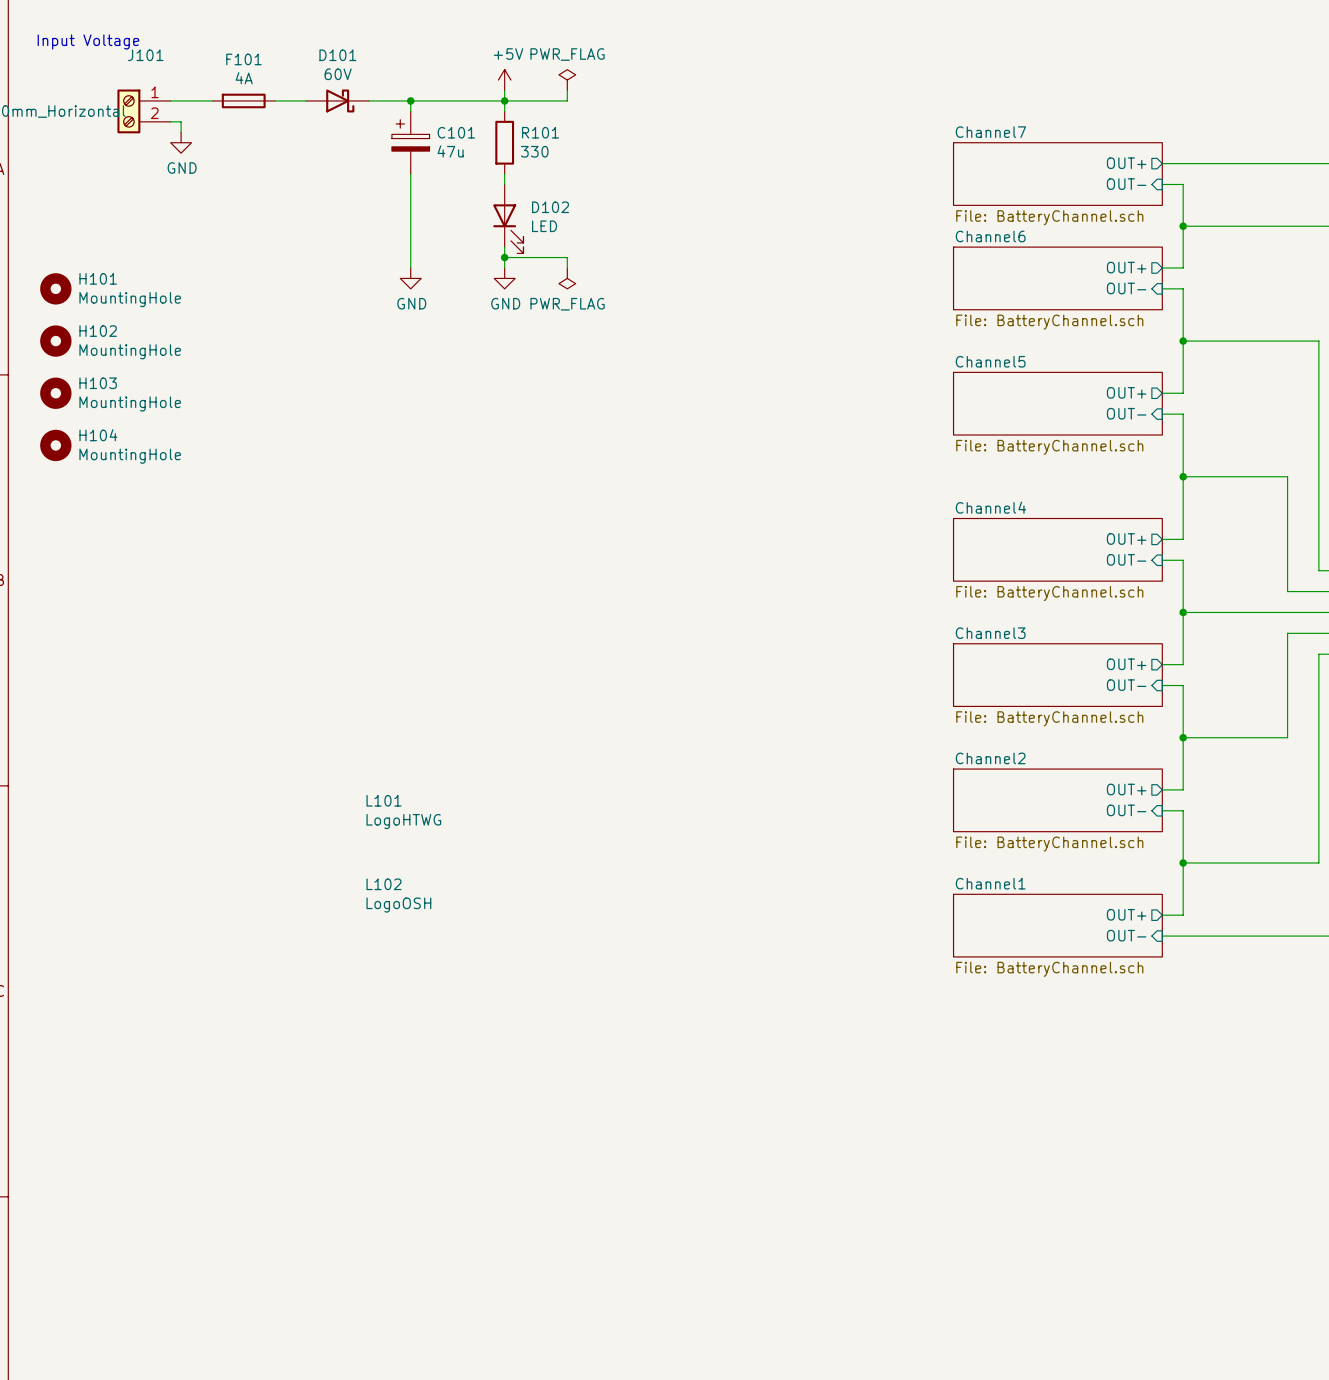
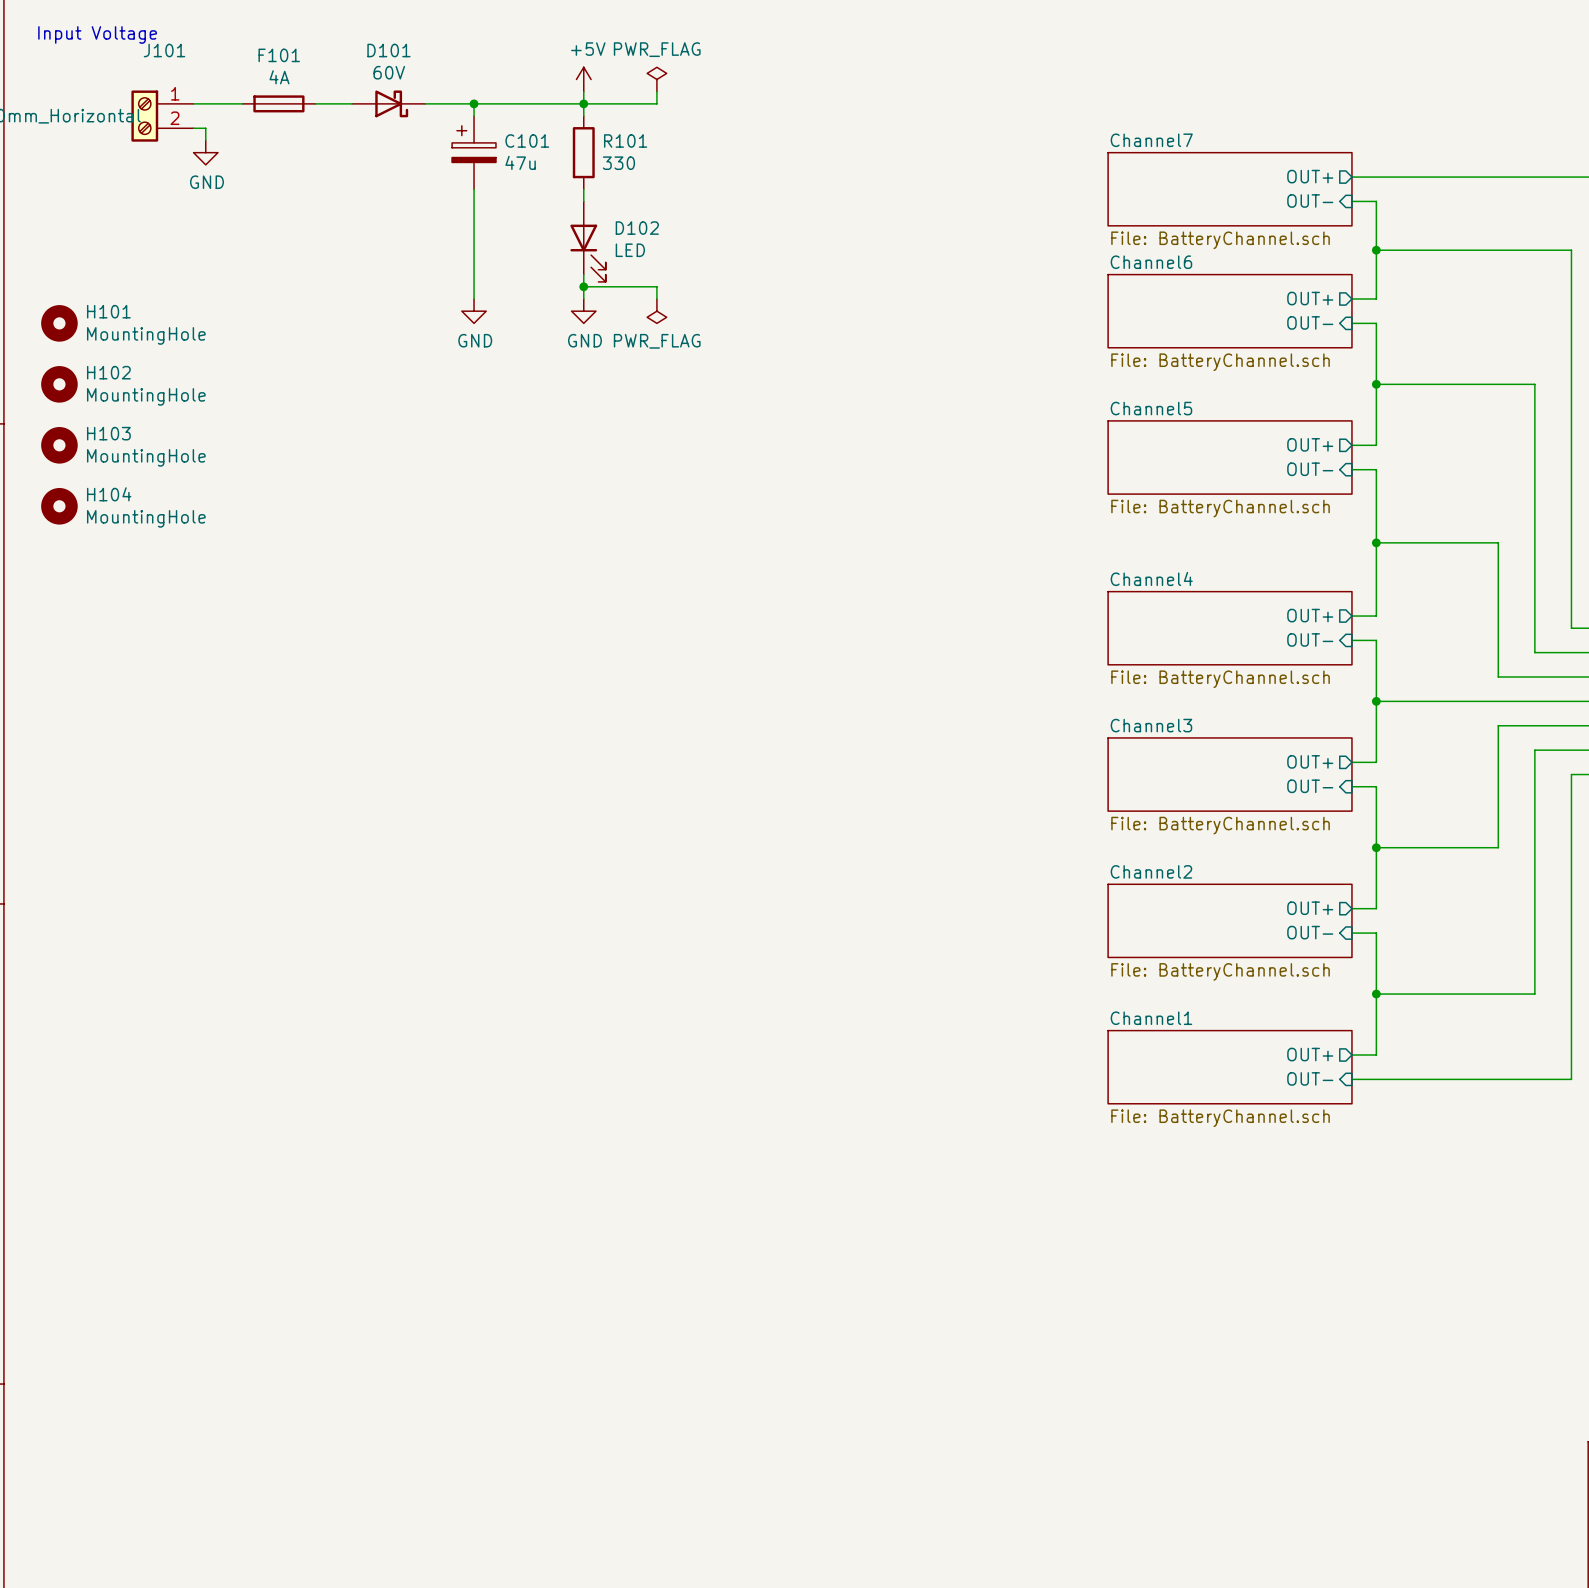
L101: LogoHTWG (403, 812) -> none
L102: LogoOSH (398, 895) -> none

